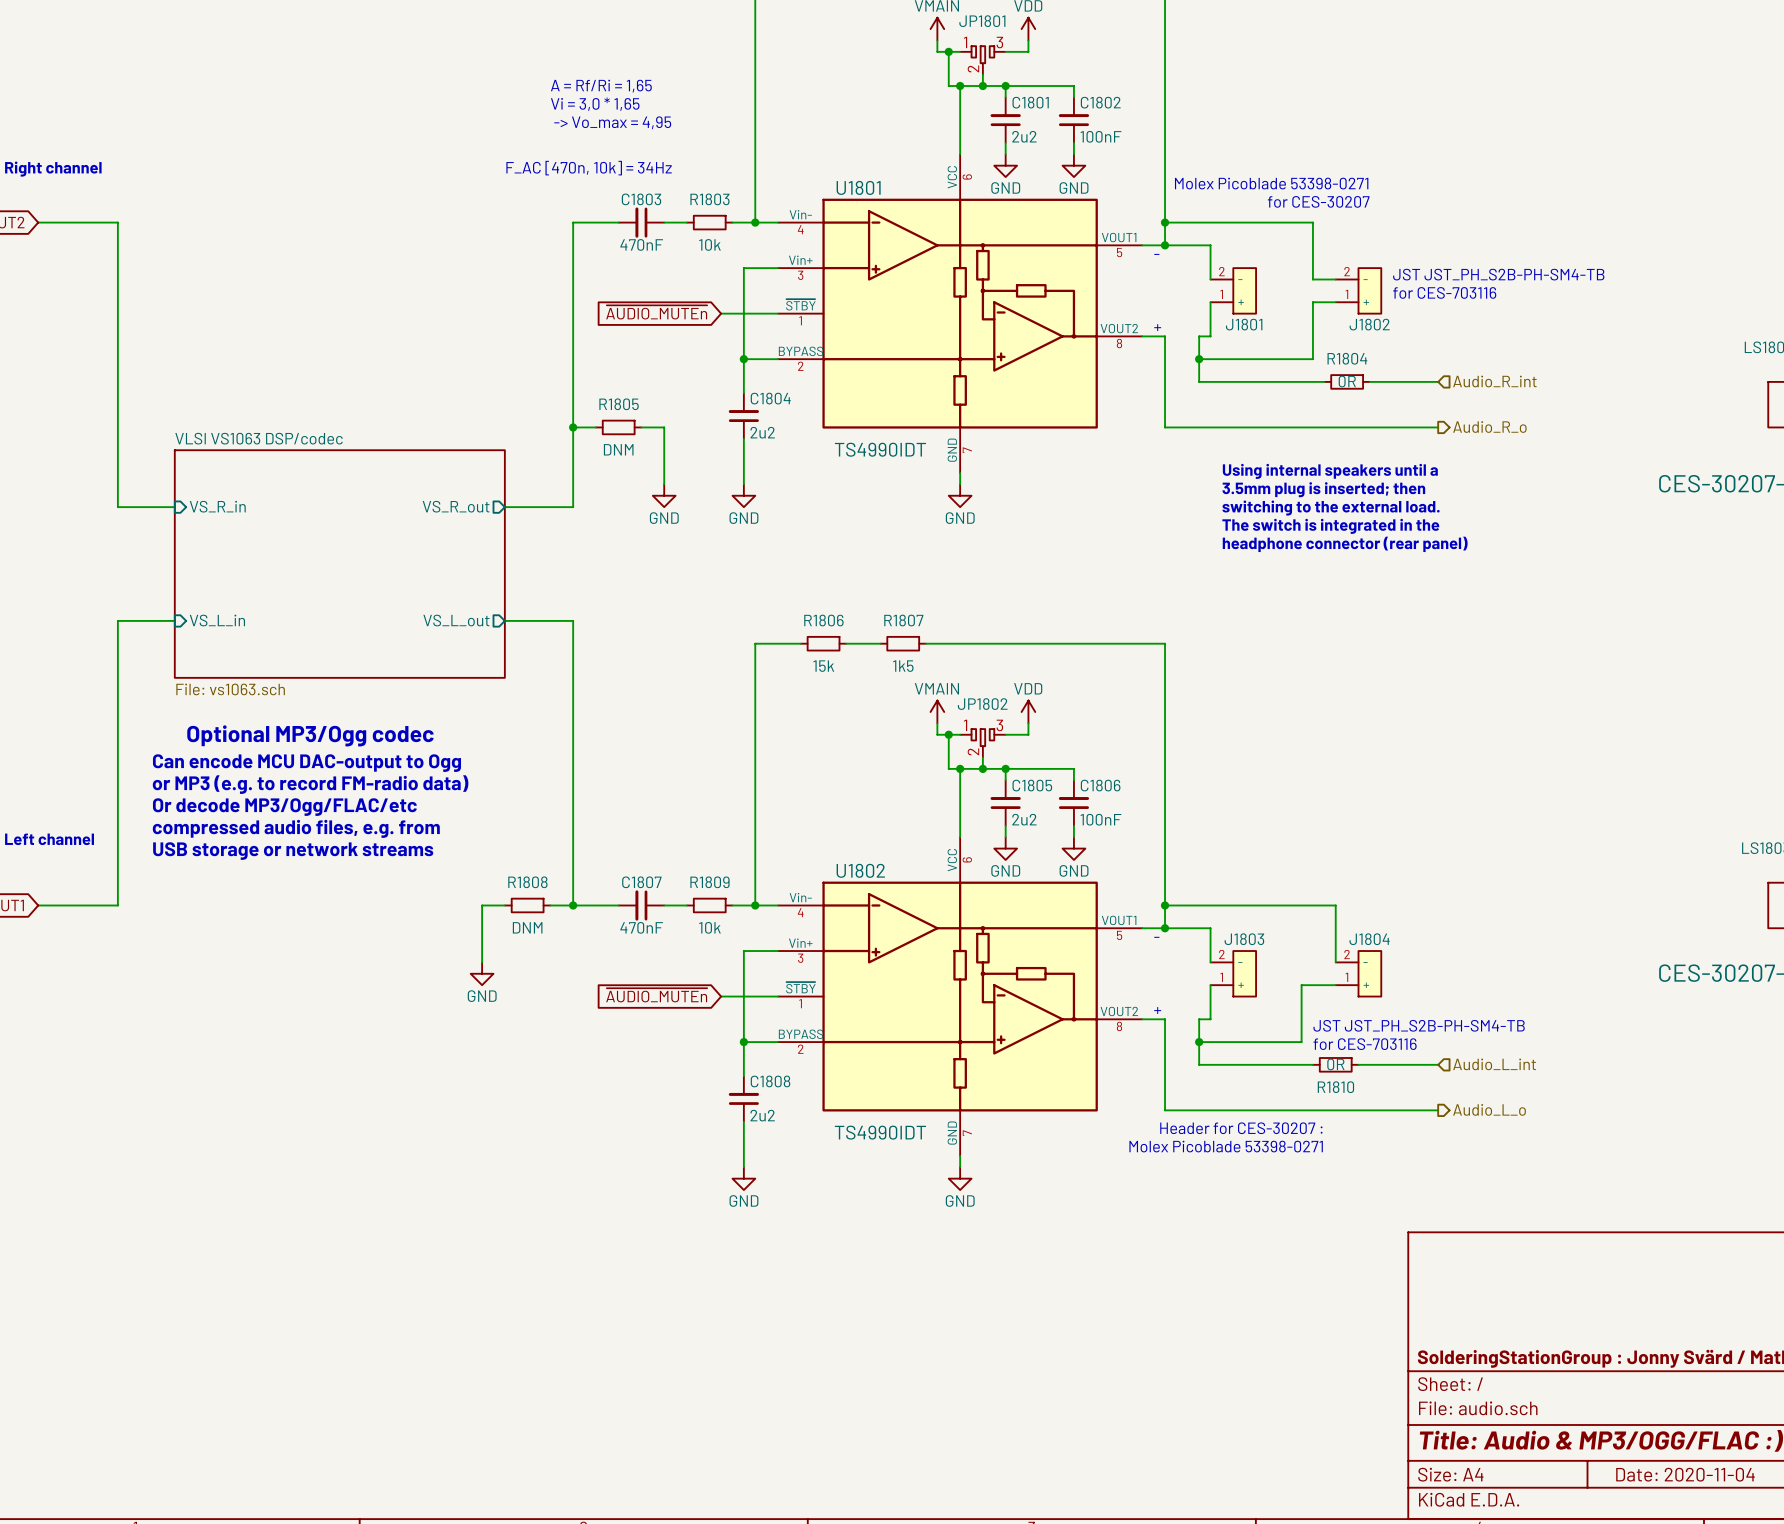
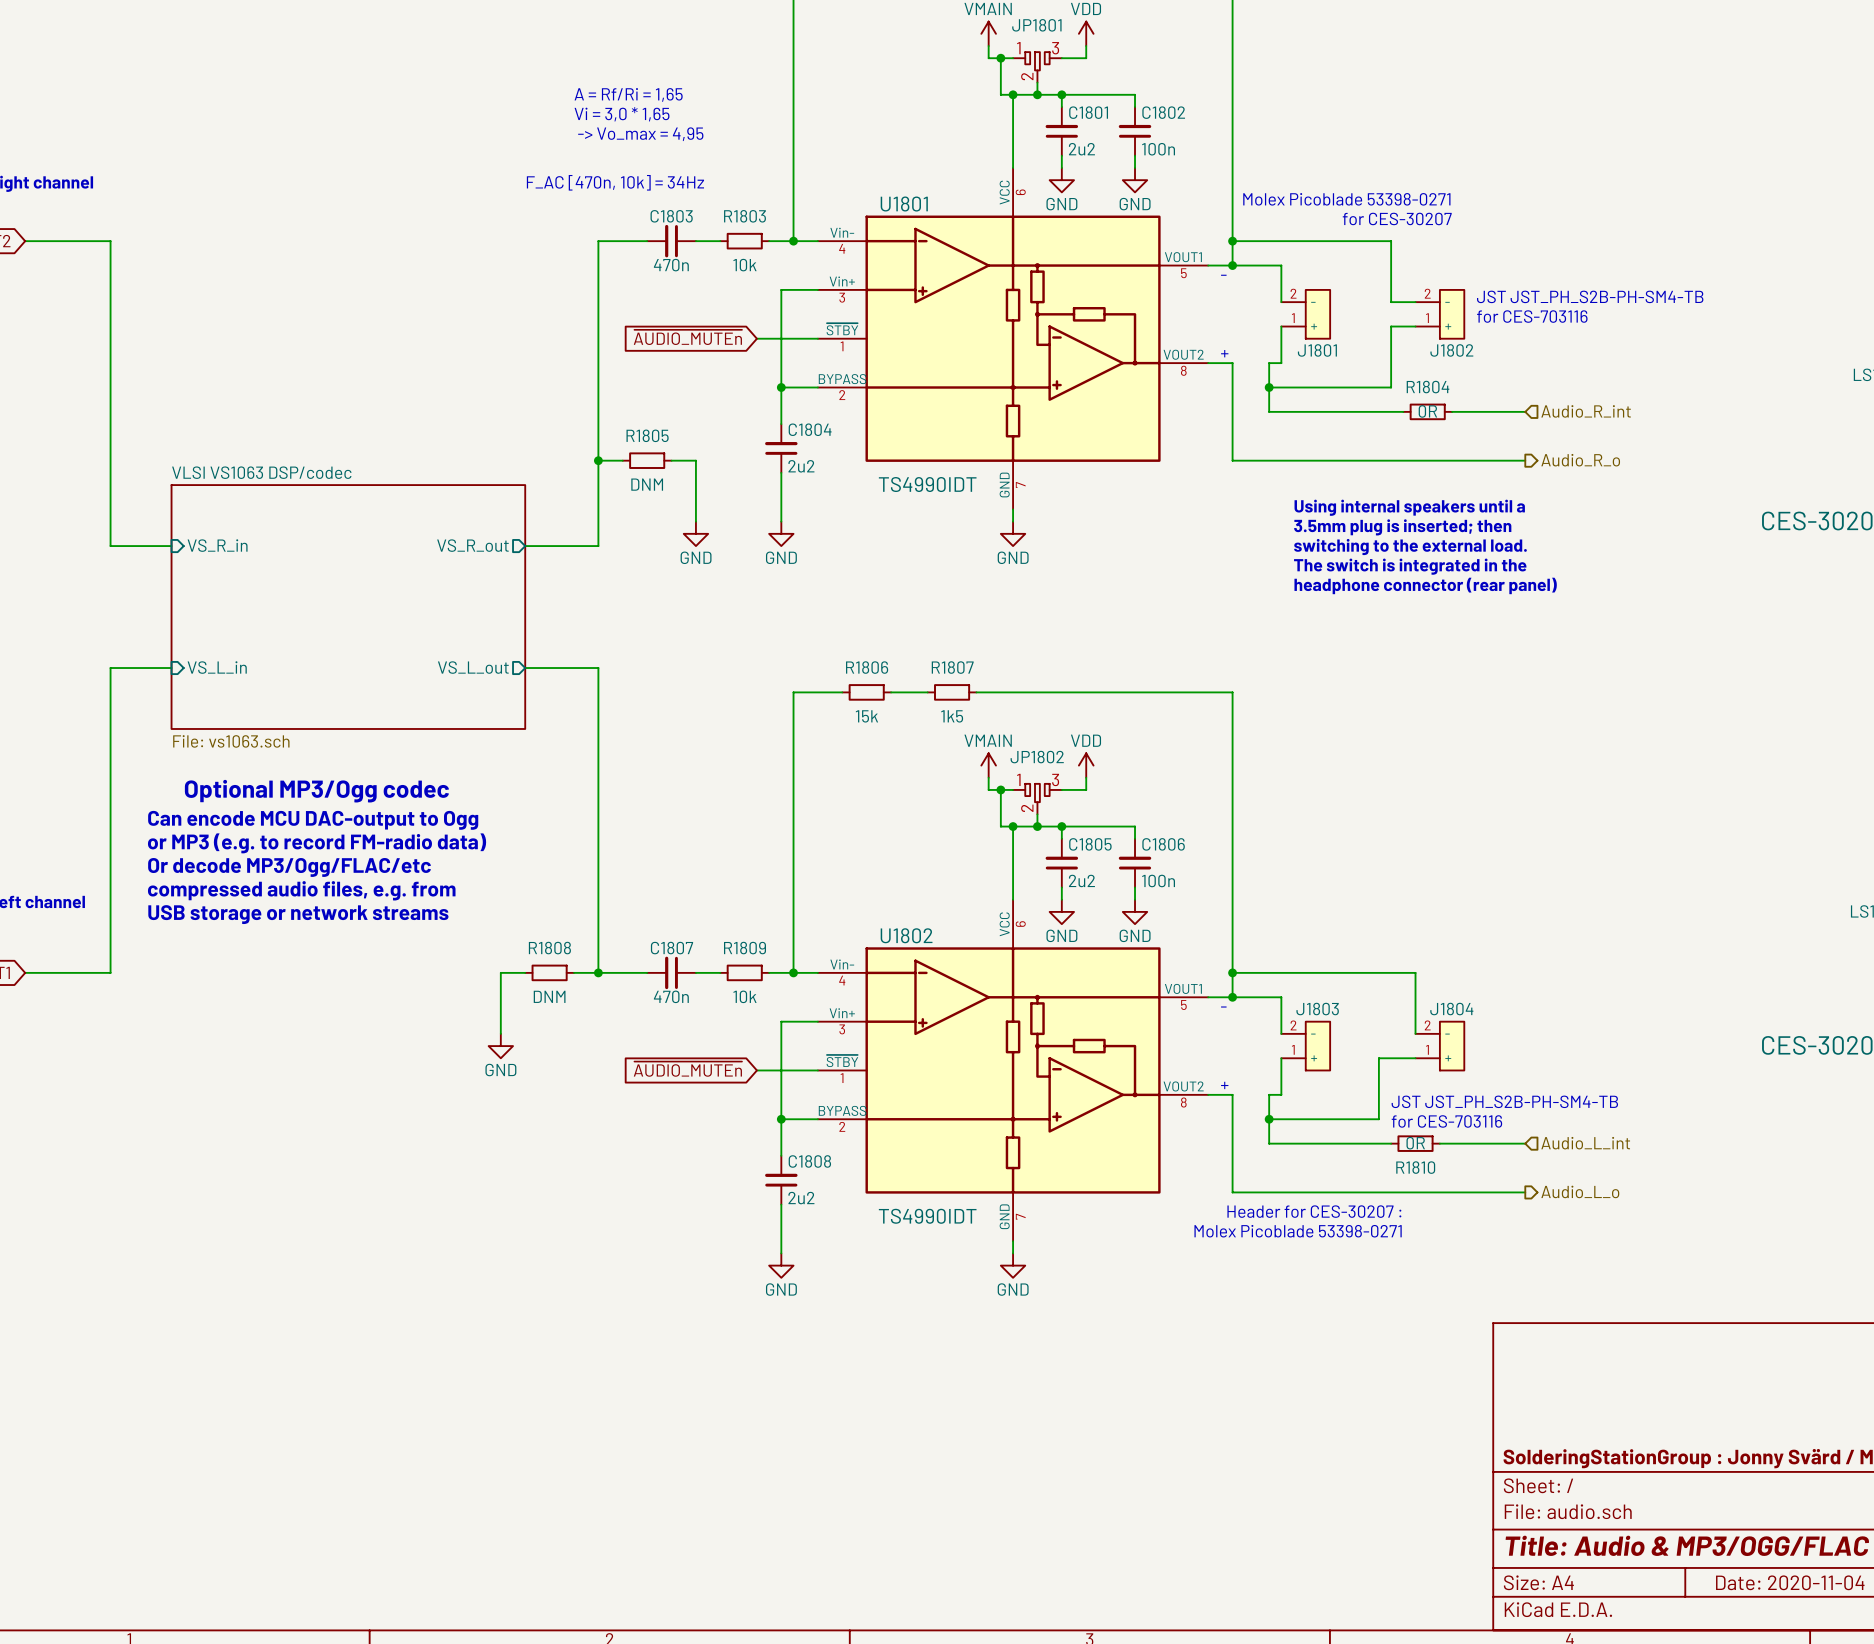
C1802 value: 100nF (1100, 136) -> 100n (1158, 149)
C1803 value: 470nF (641, 244) -> 470n (671, 265)
C1806 value: 100nF (1100, 819) -> 100n (1158, 880)
C1807 value: 470nF (641, 927) -> 470n (671, 996)

